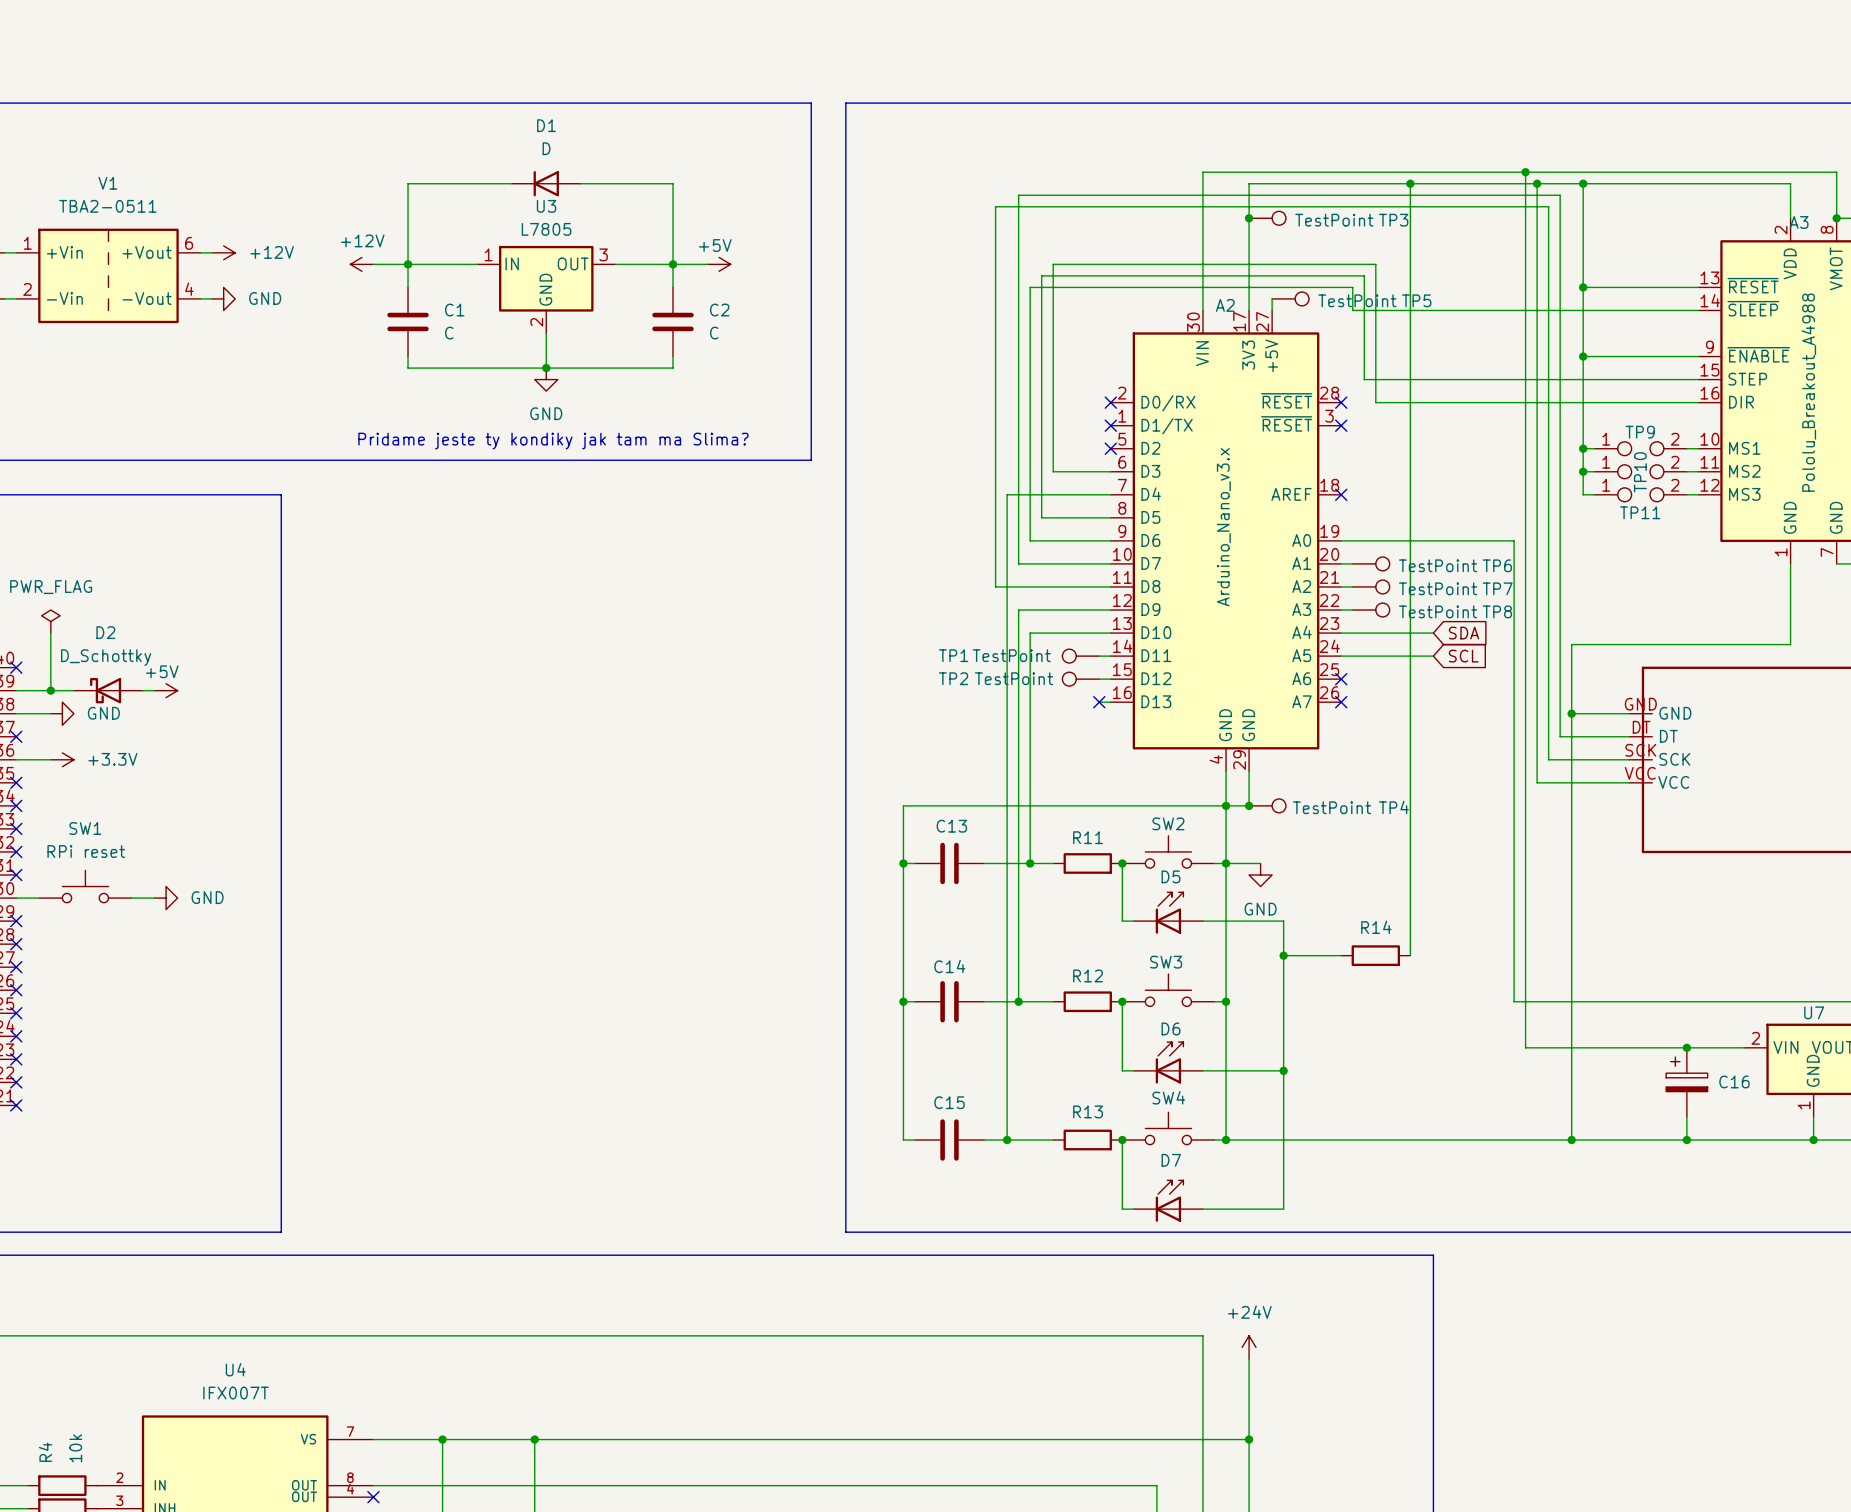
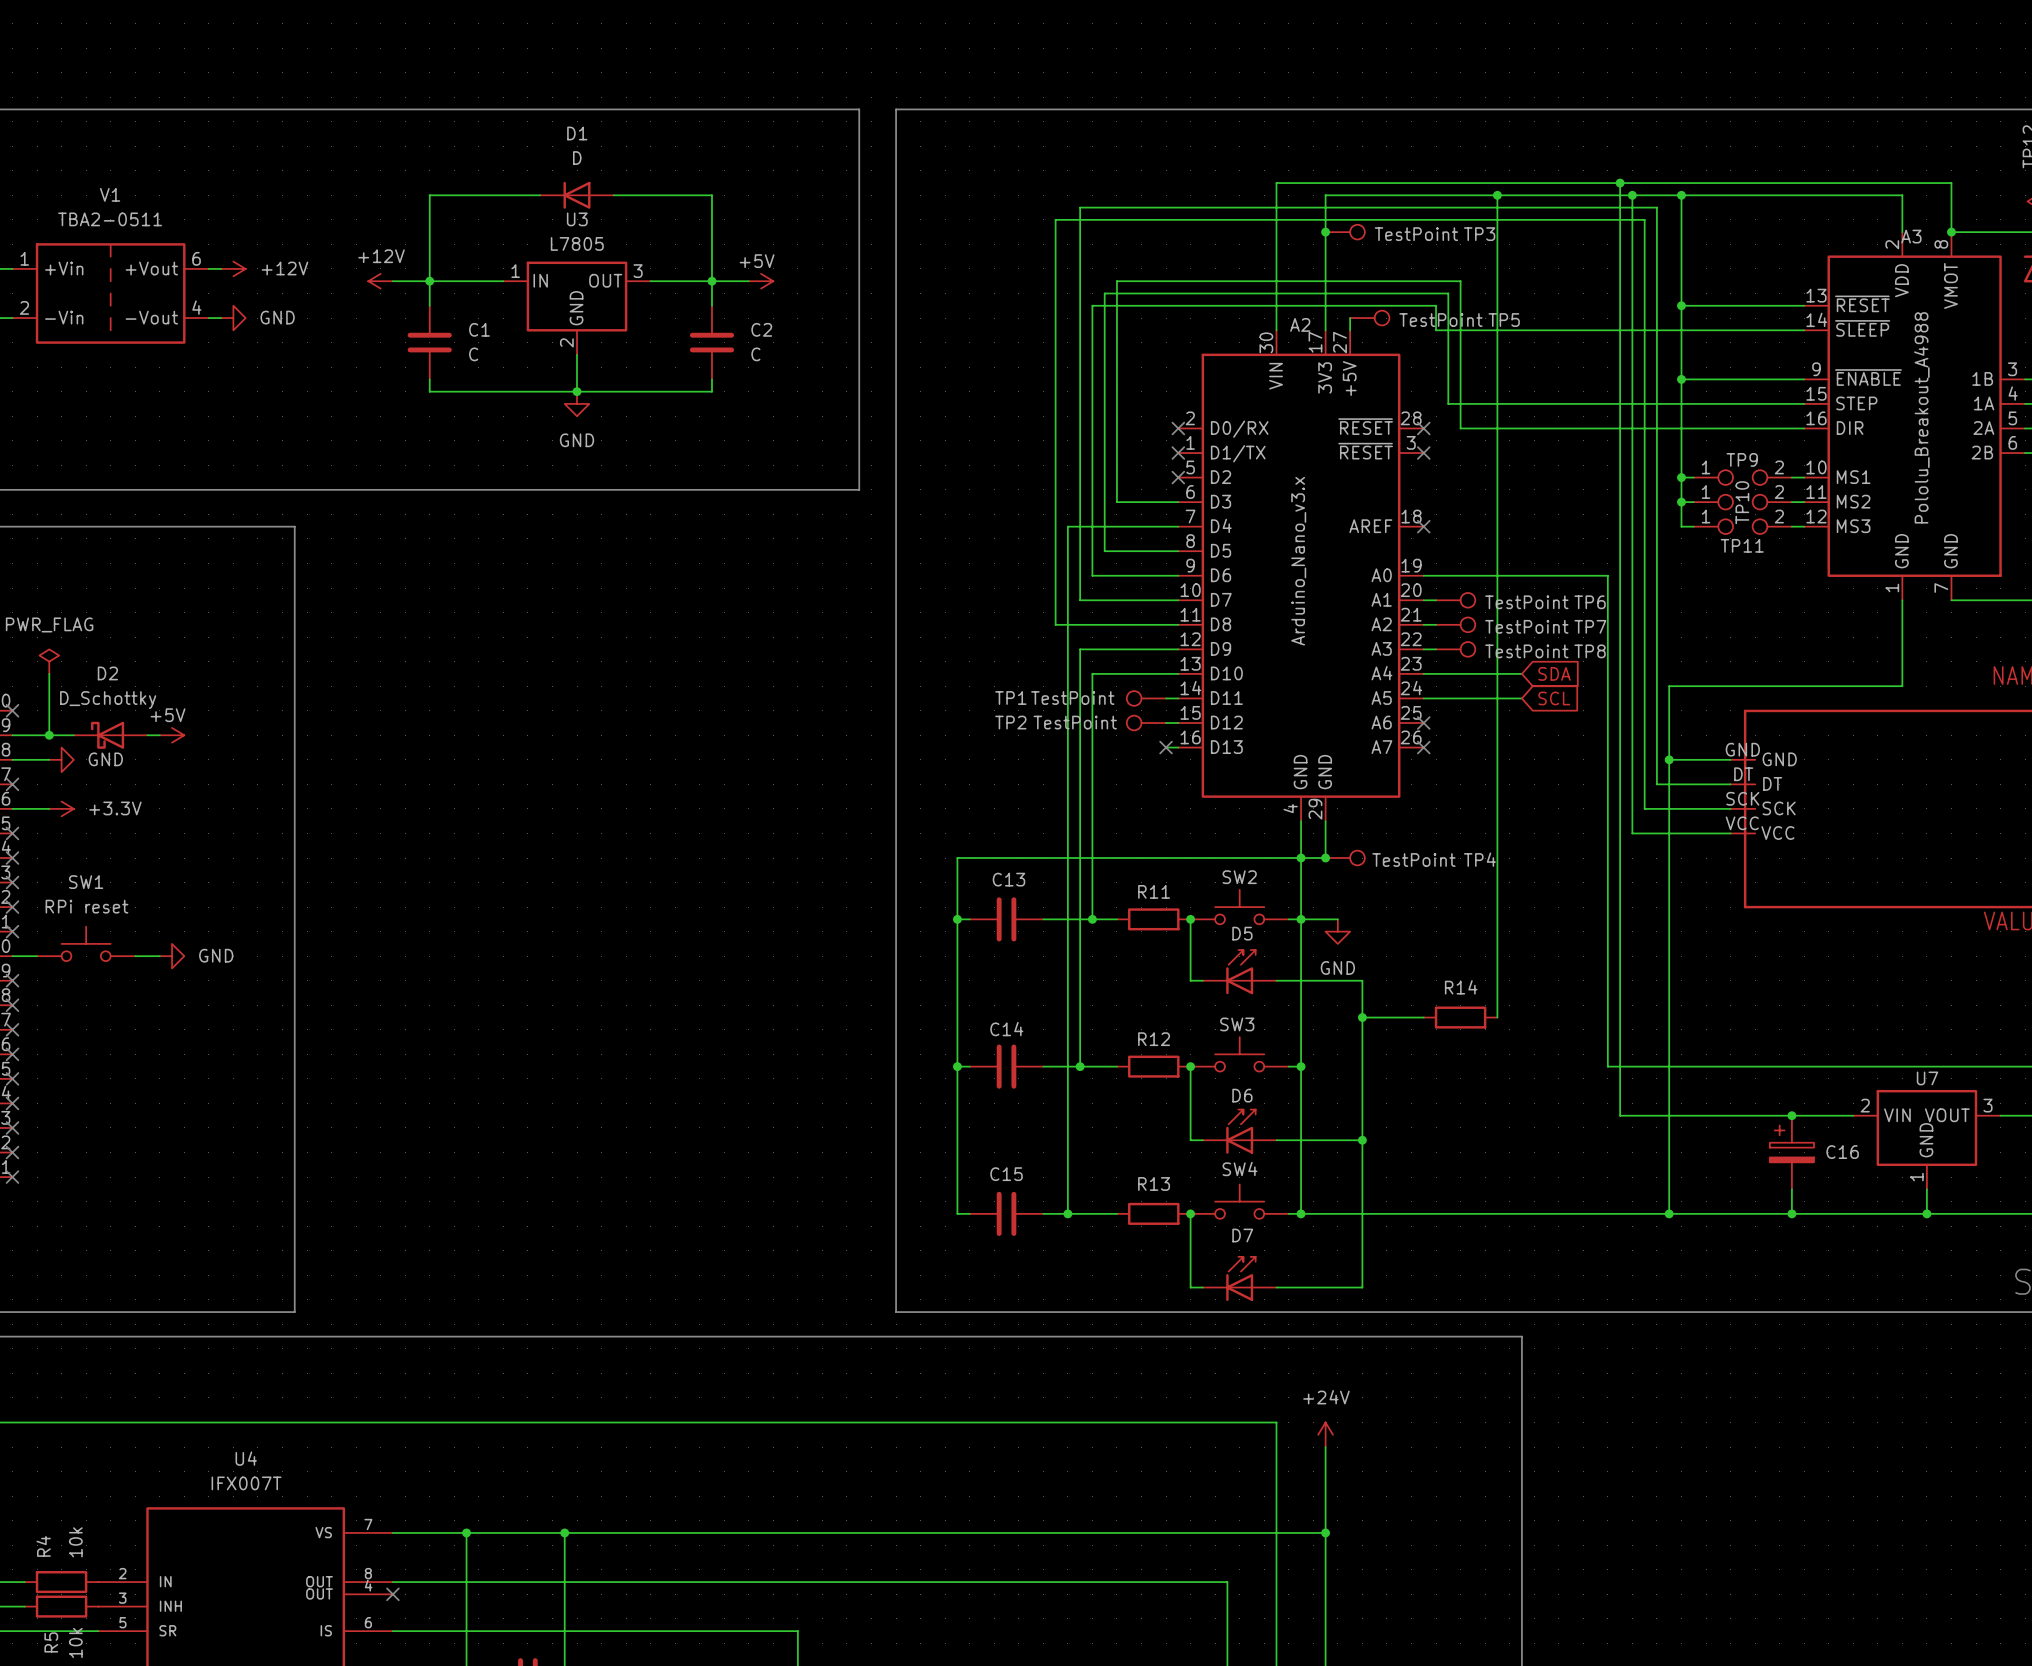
text: Pridame jeste ty kondiky jak tam ma Slima? (553, 441) -> none

